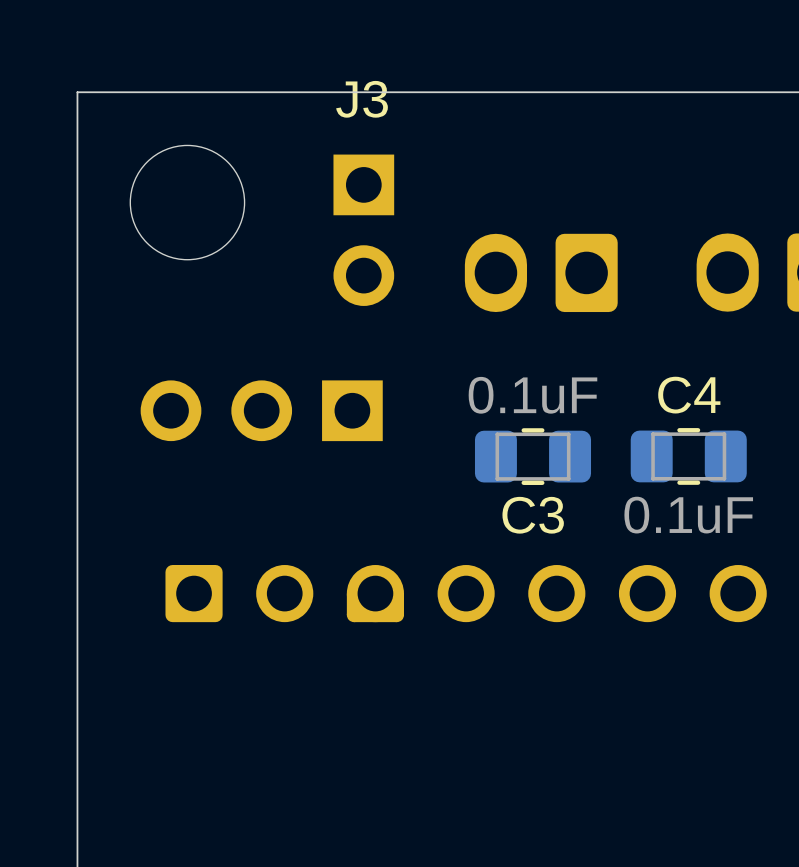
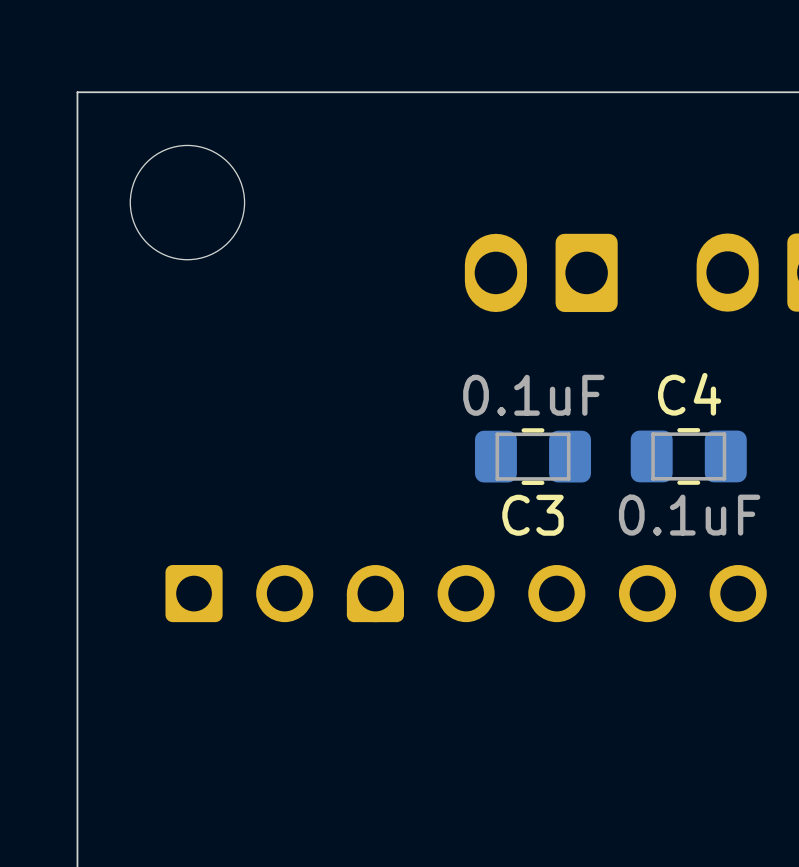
J3: (363, 230) -> none
part: (261, 410) -> none

